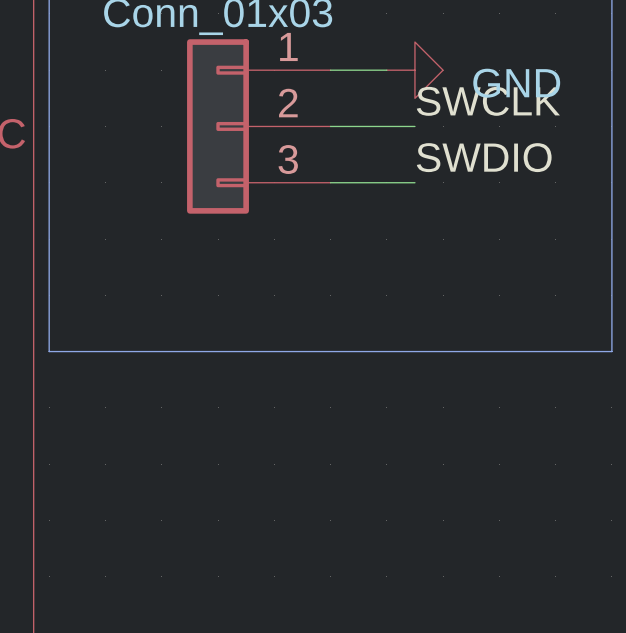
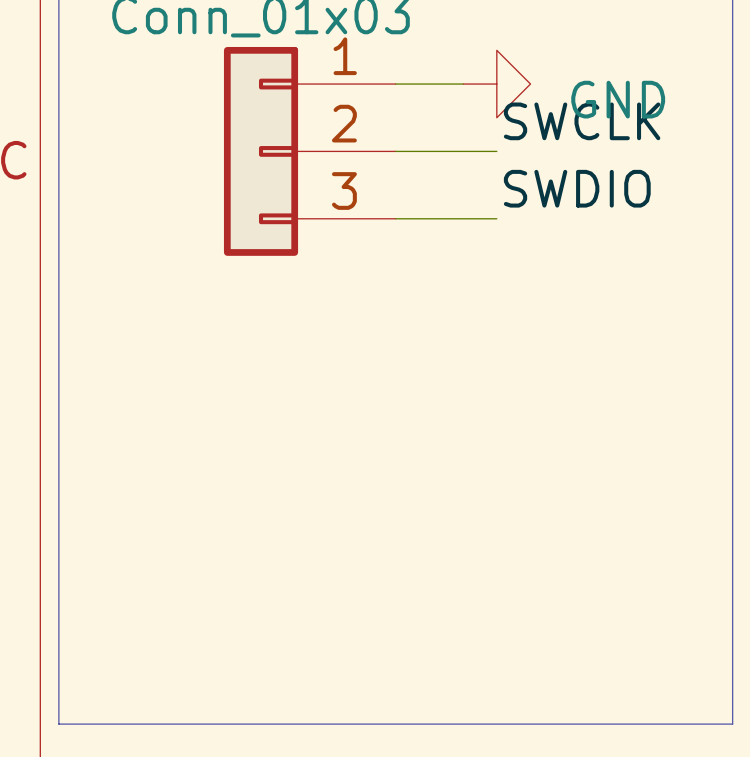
line: (49, 351) (611, 351) -> (58, 420) (58, 724) (732, 724) (732, 420)

